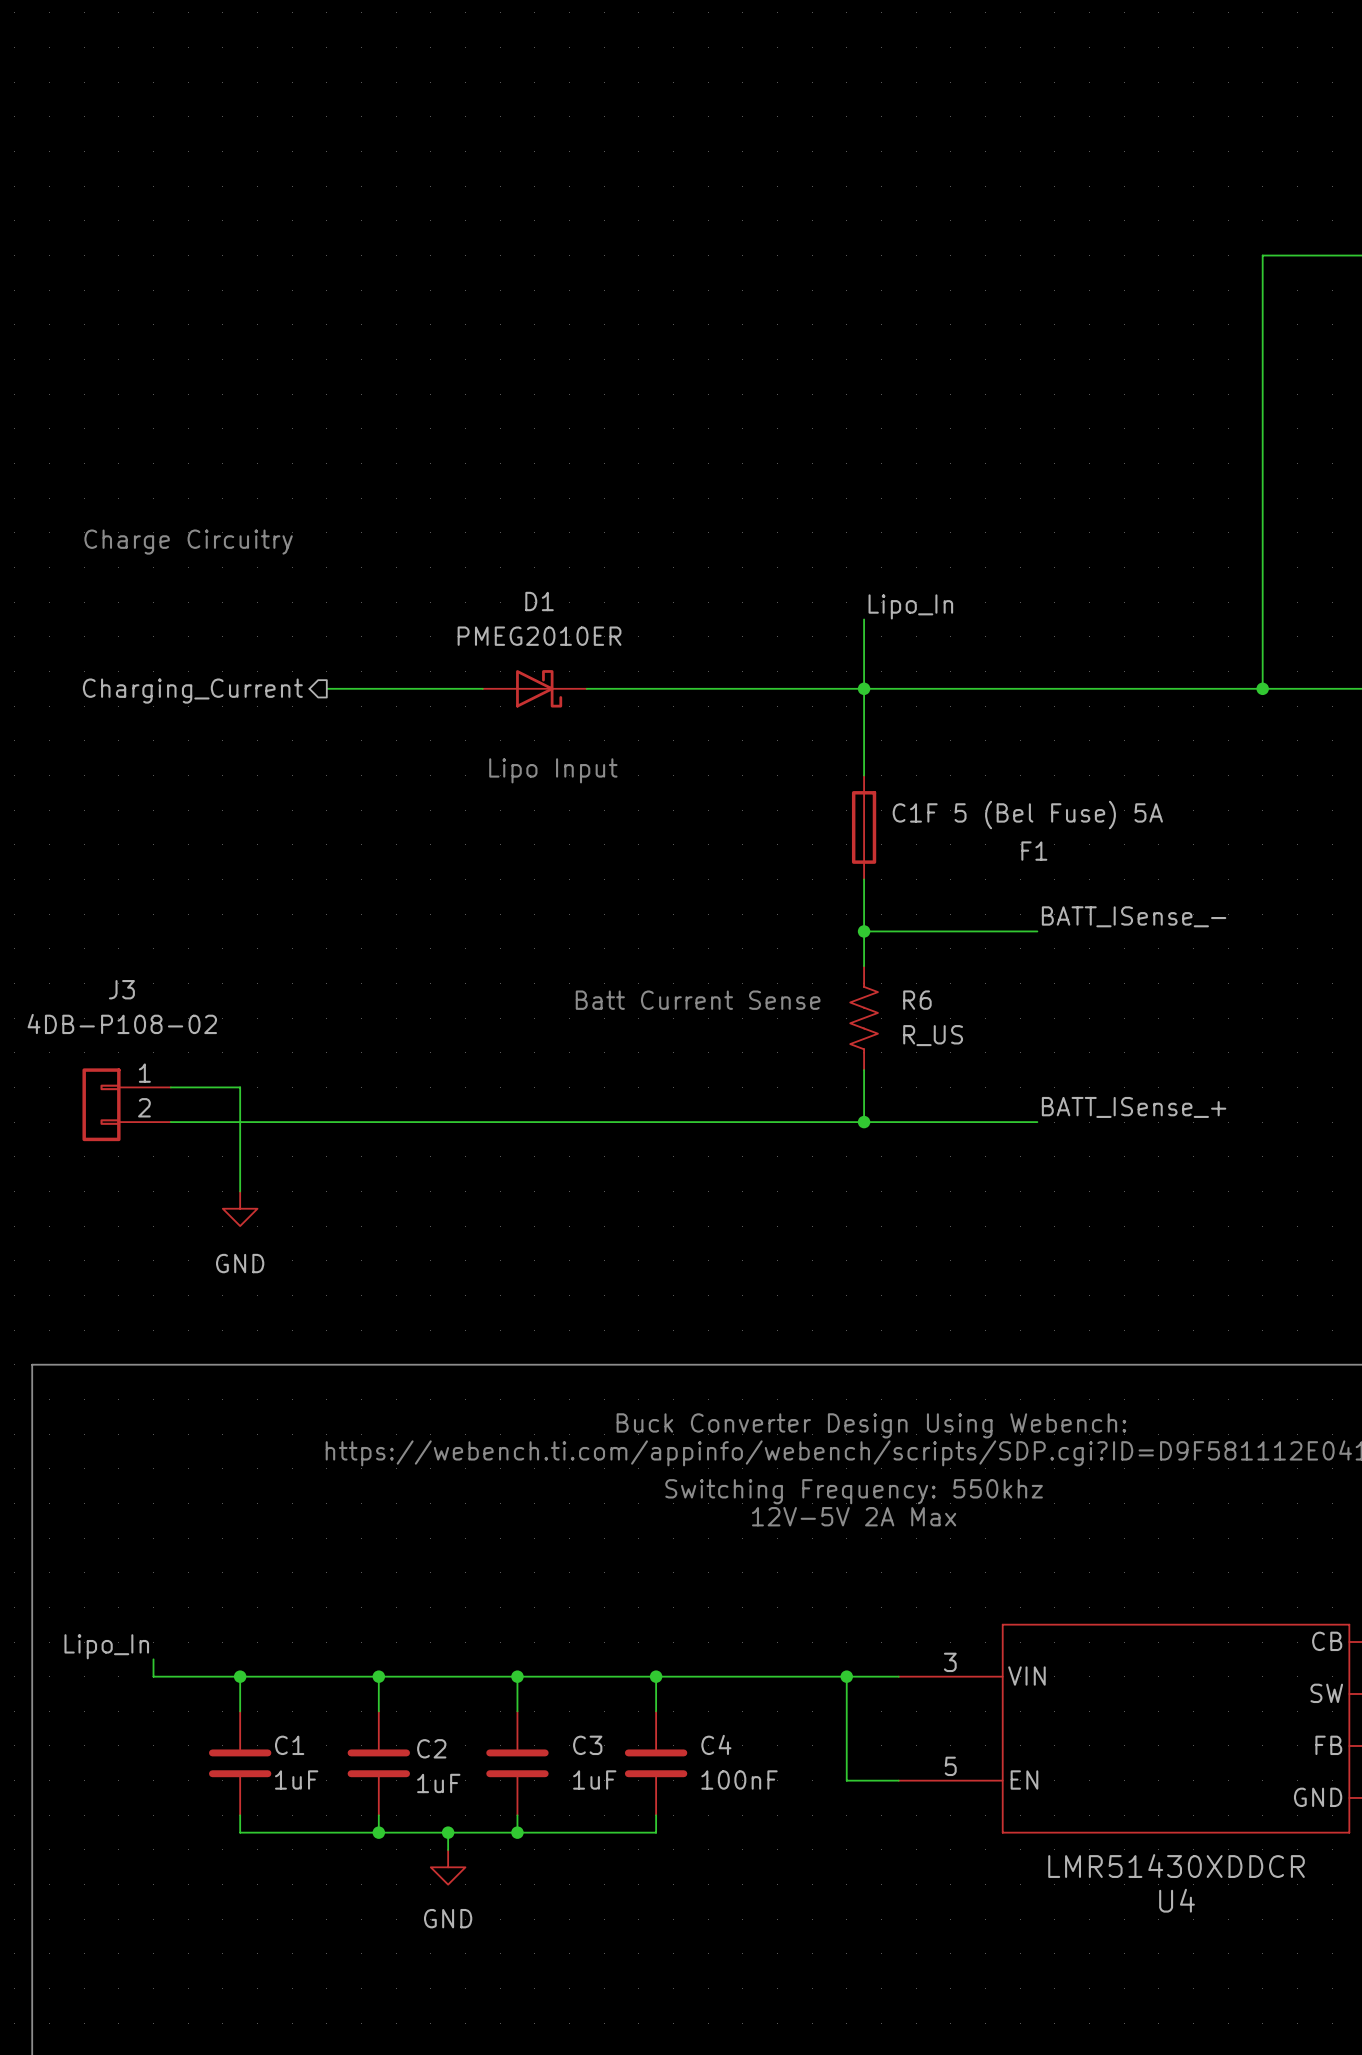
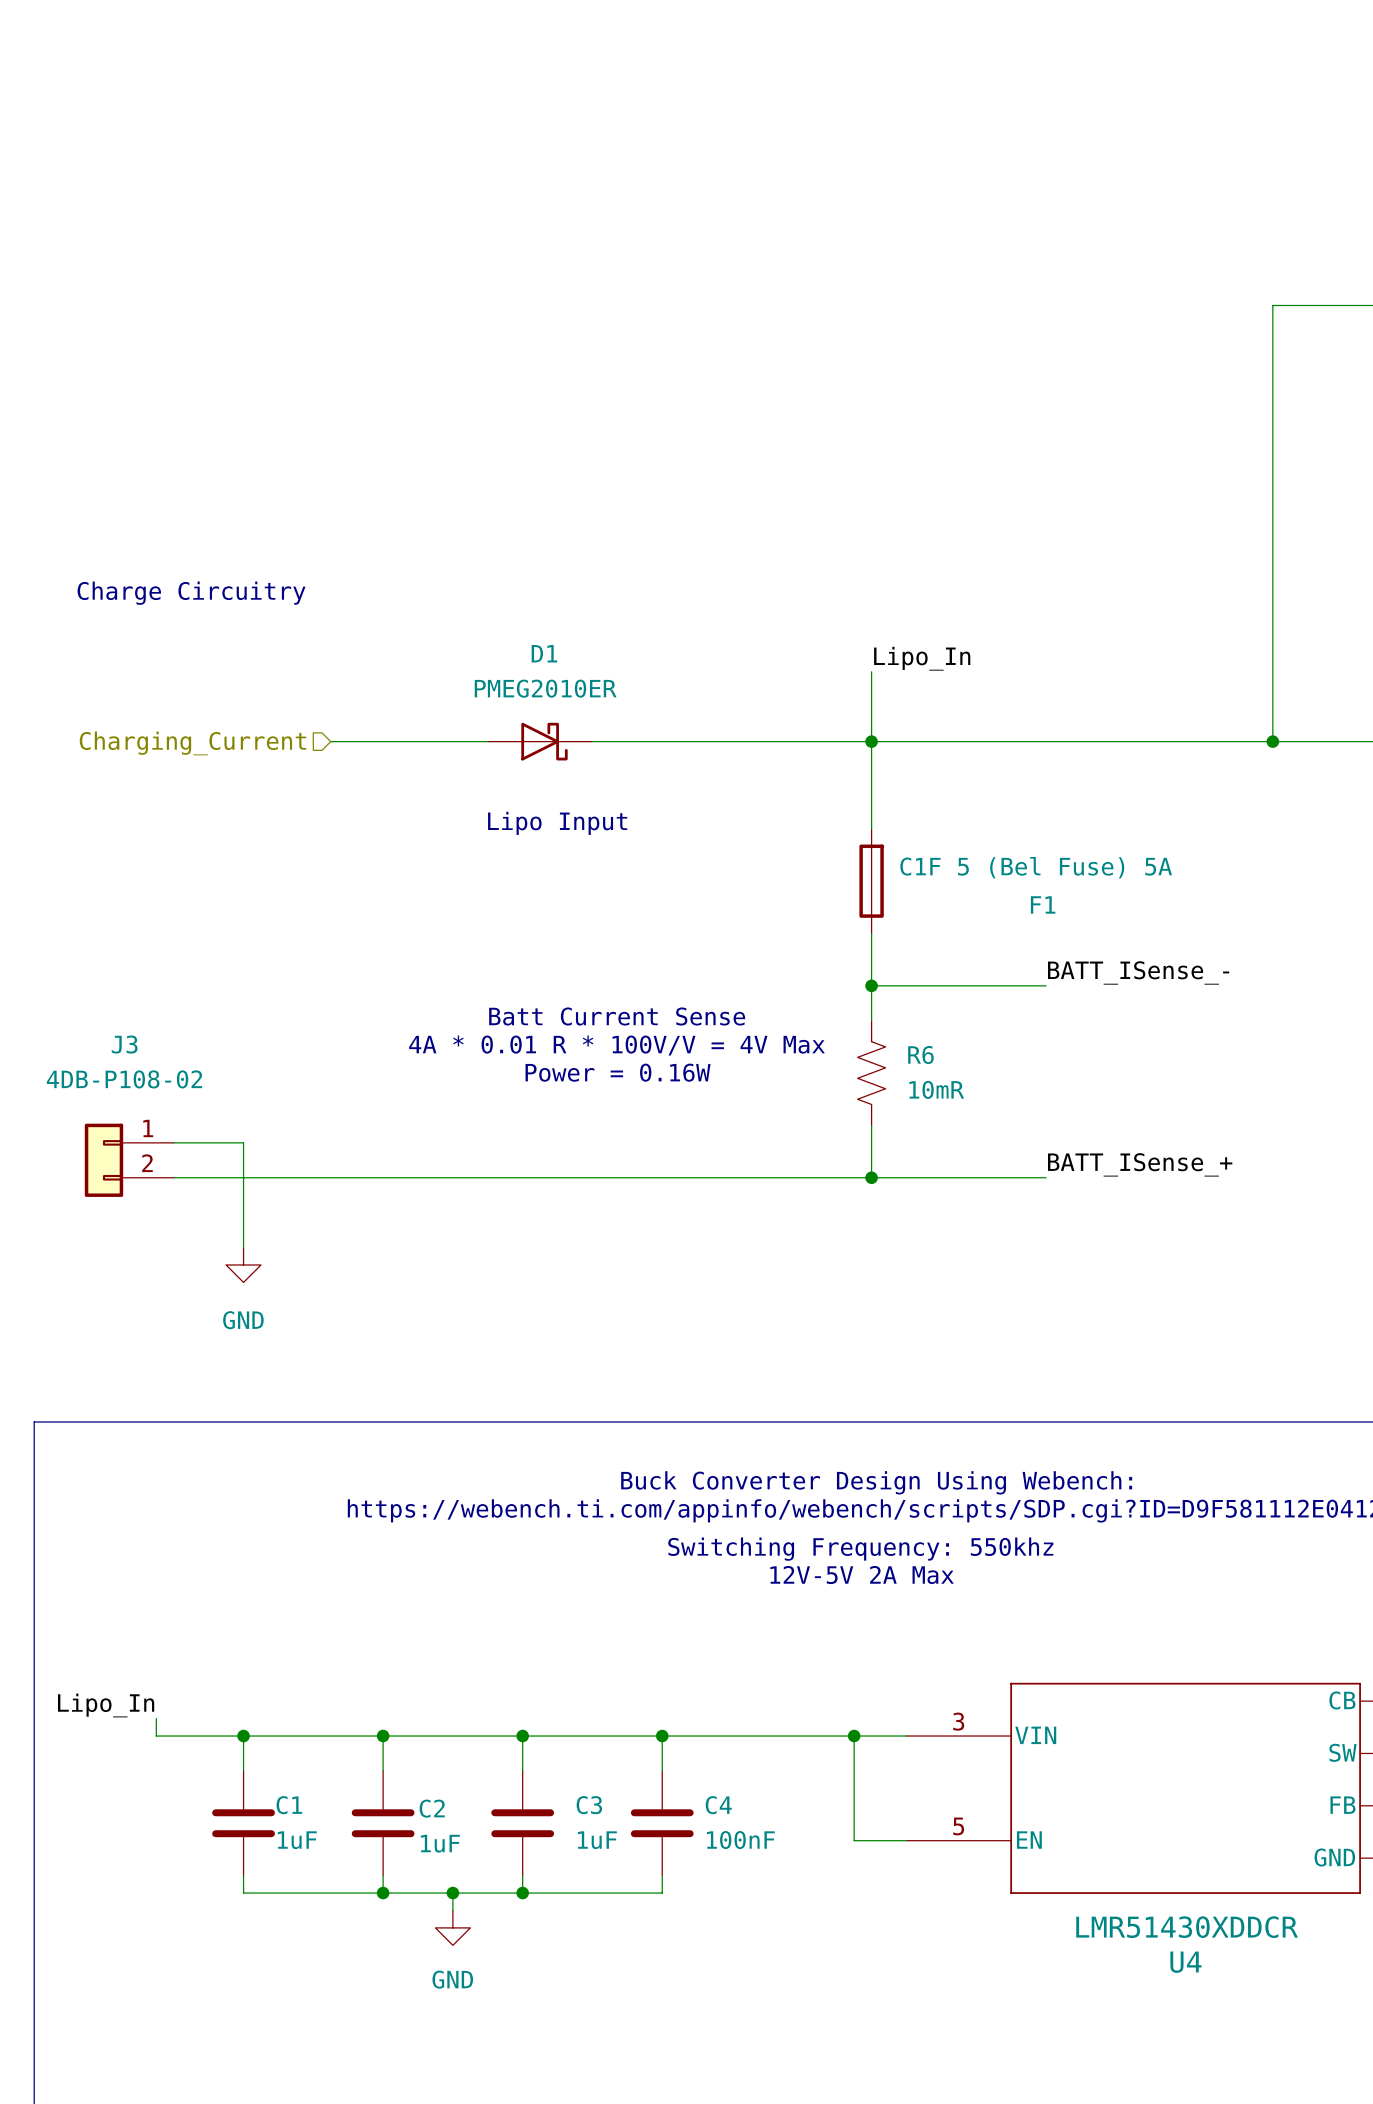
hierarchical label shape: output (192, 691) -> input (193, 743)
text: none -> 4A * 0.01 R * 100V/V = 4V Max (617, 1045)
text position: Batt Current Sense (698, 1000) -> Batt Current Sense (617, 1016)
text: none -> Power = 0.16W (618, 1072)
R6 value: R_US (933, 1035) -> 10mR (936, 1089)

